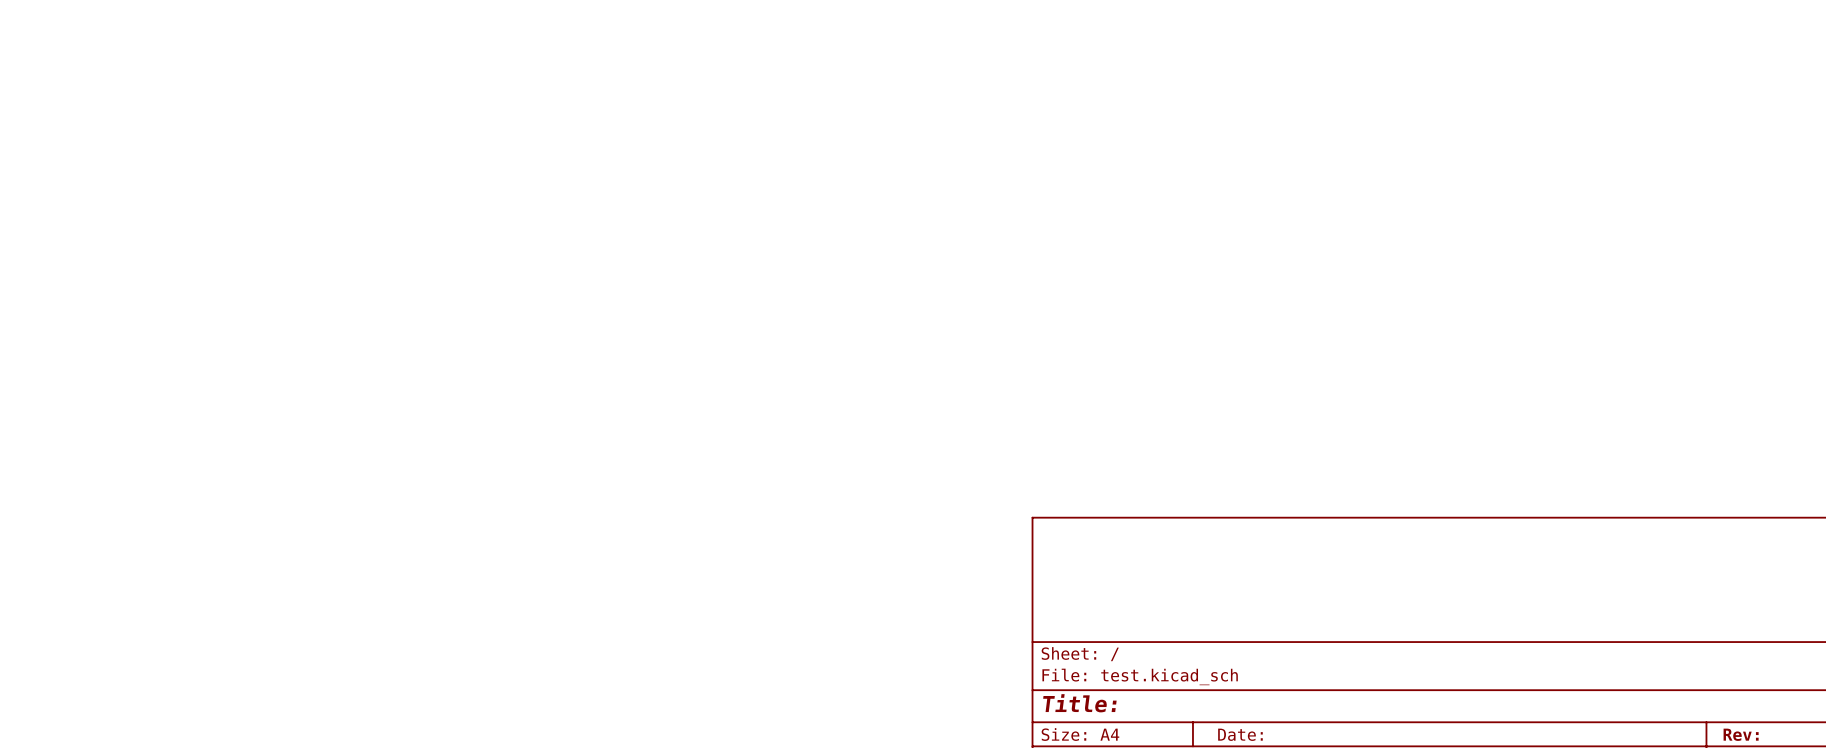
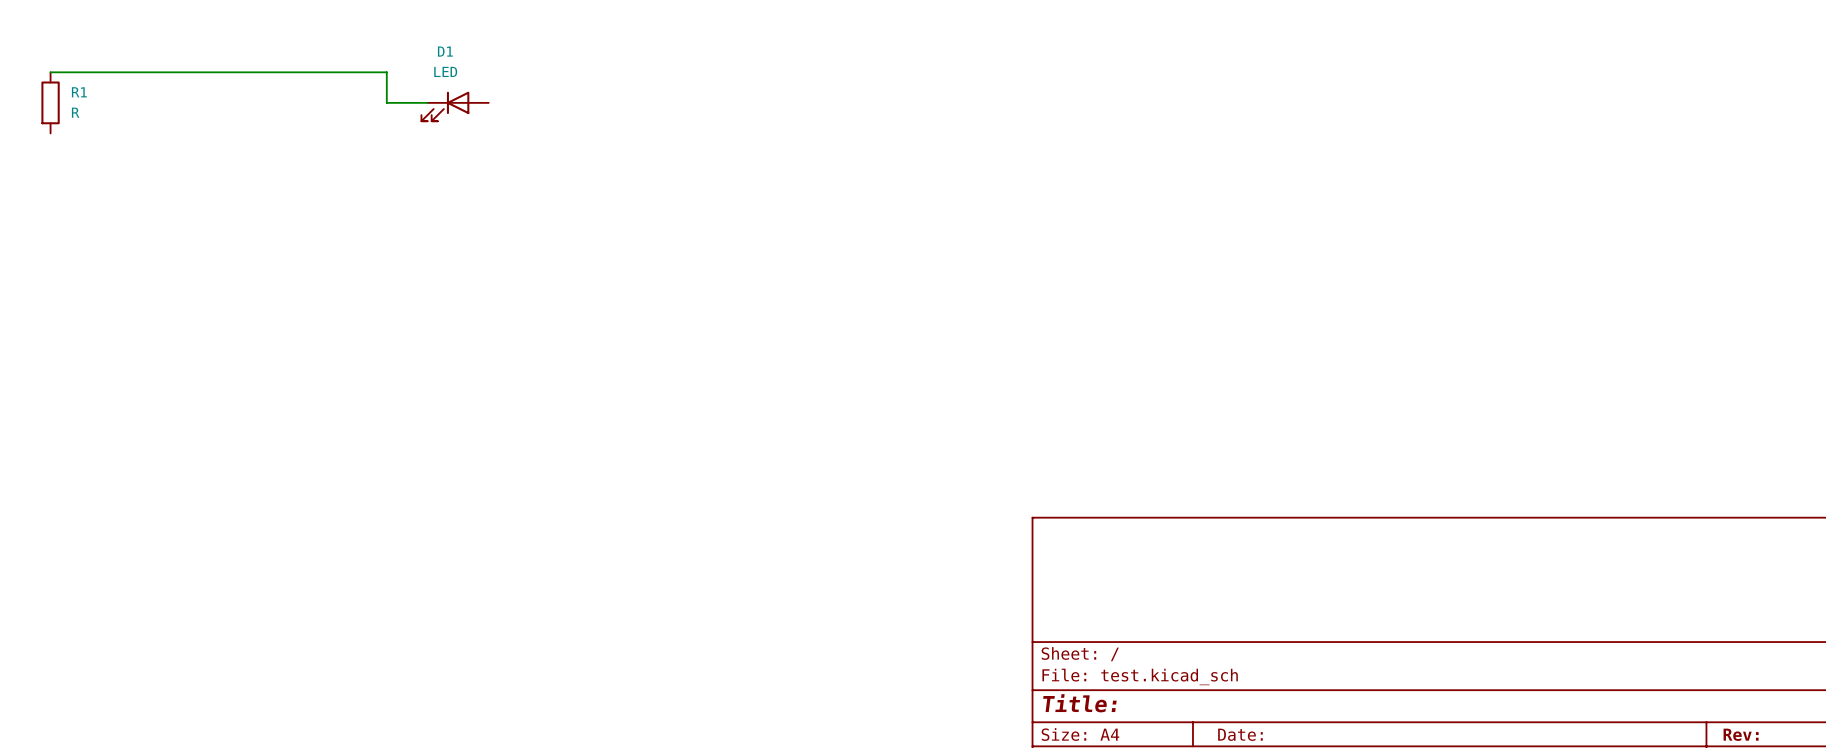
wire: none -> (50, 72) (386, 72) (386, 102) (427, 102)
R1: none -> R (50, 102)
D1: none -> LED (455, 106)

